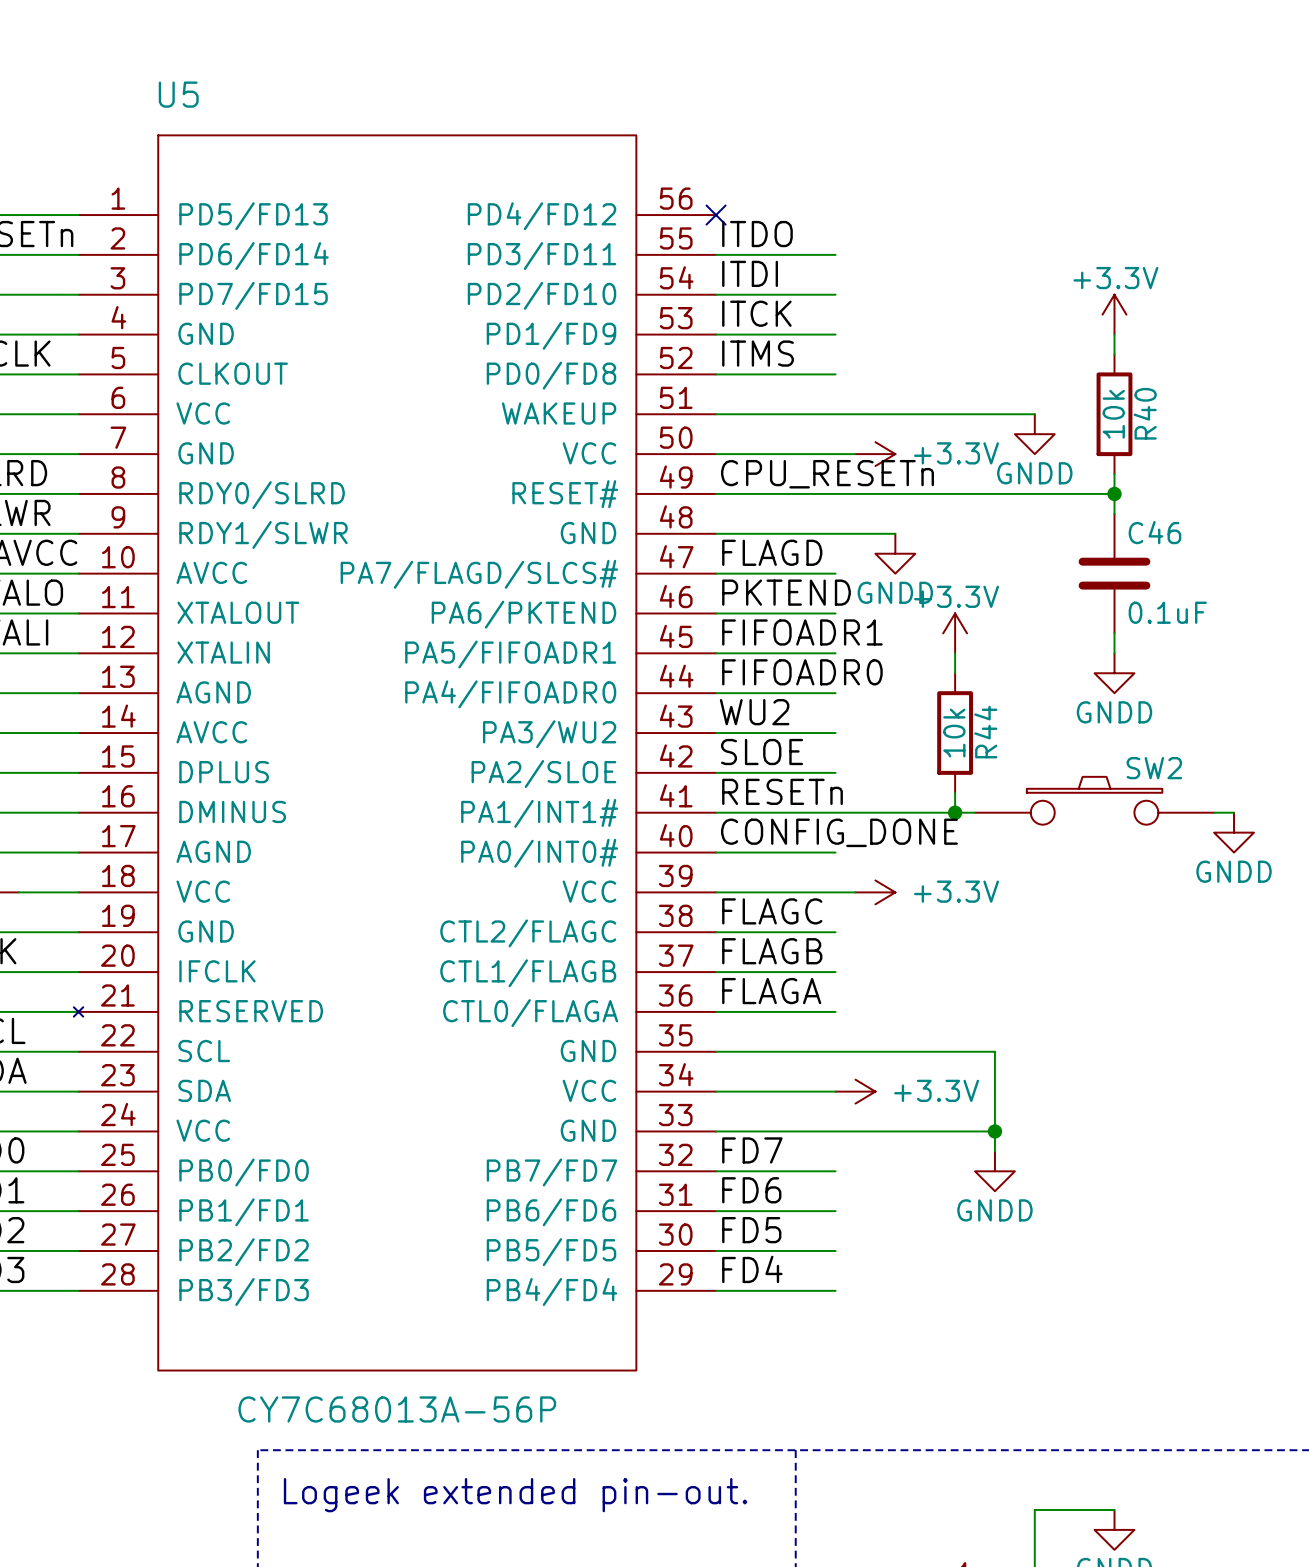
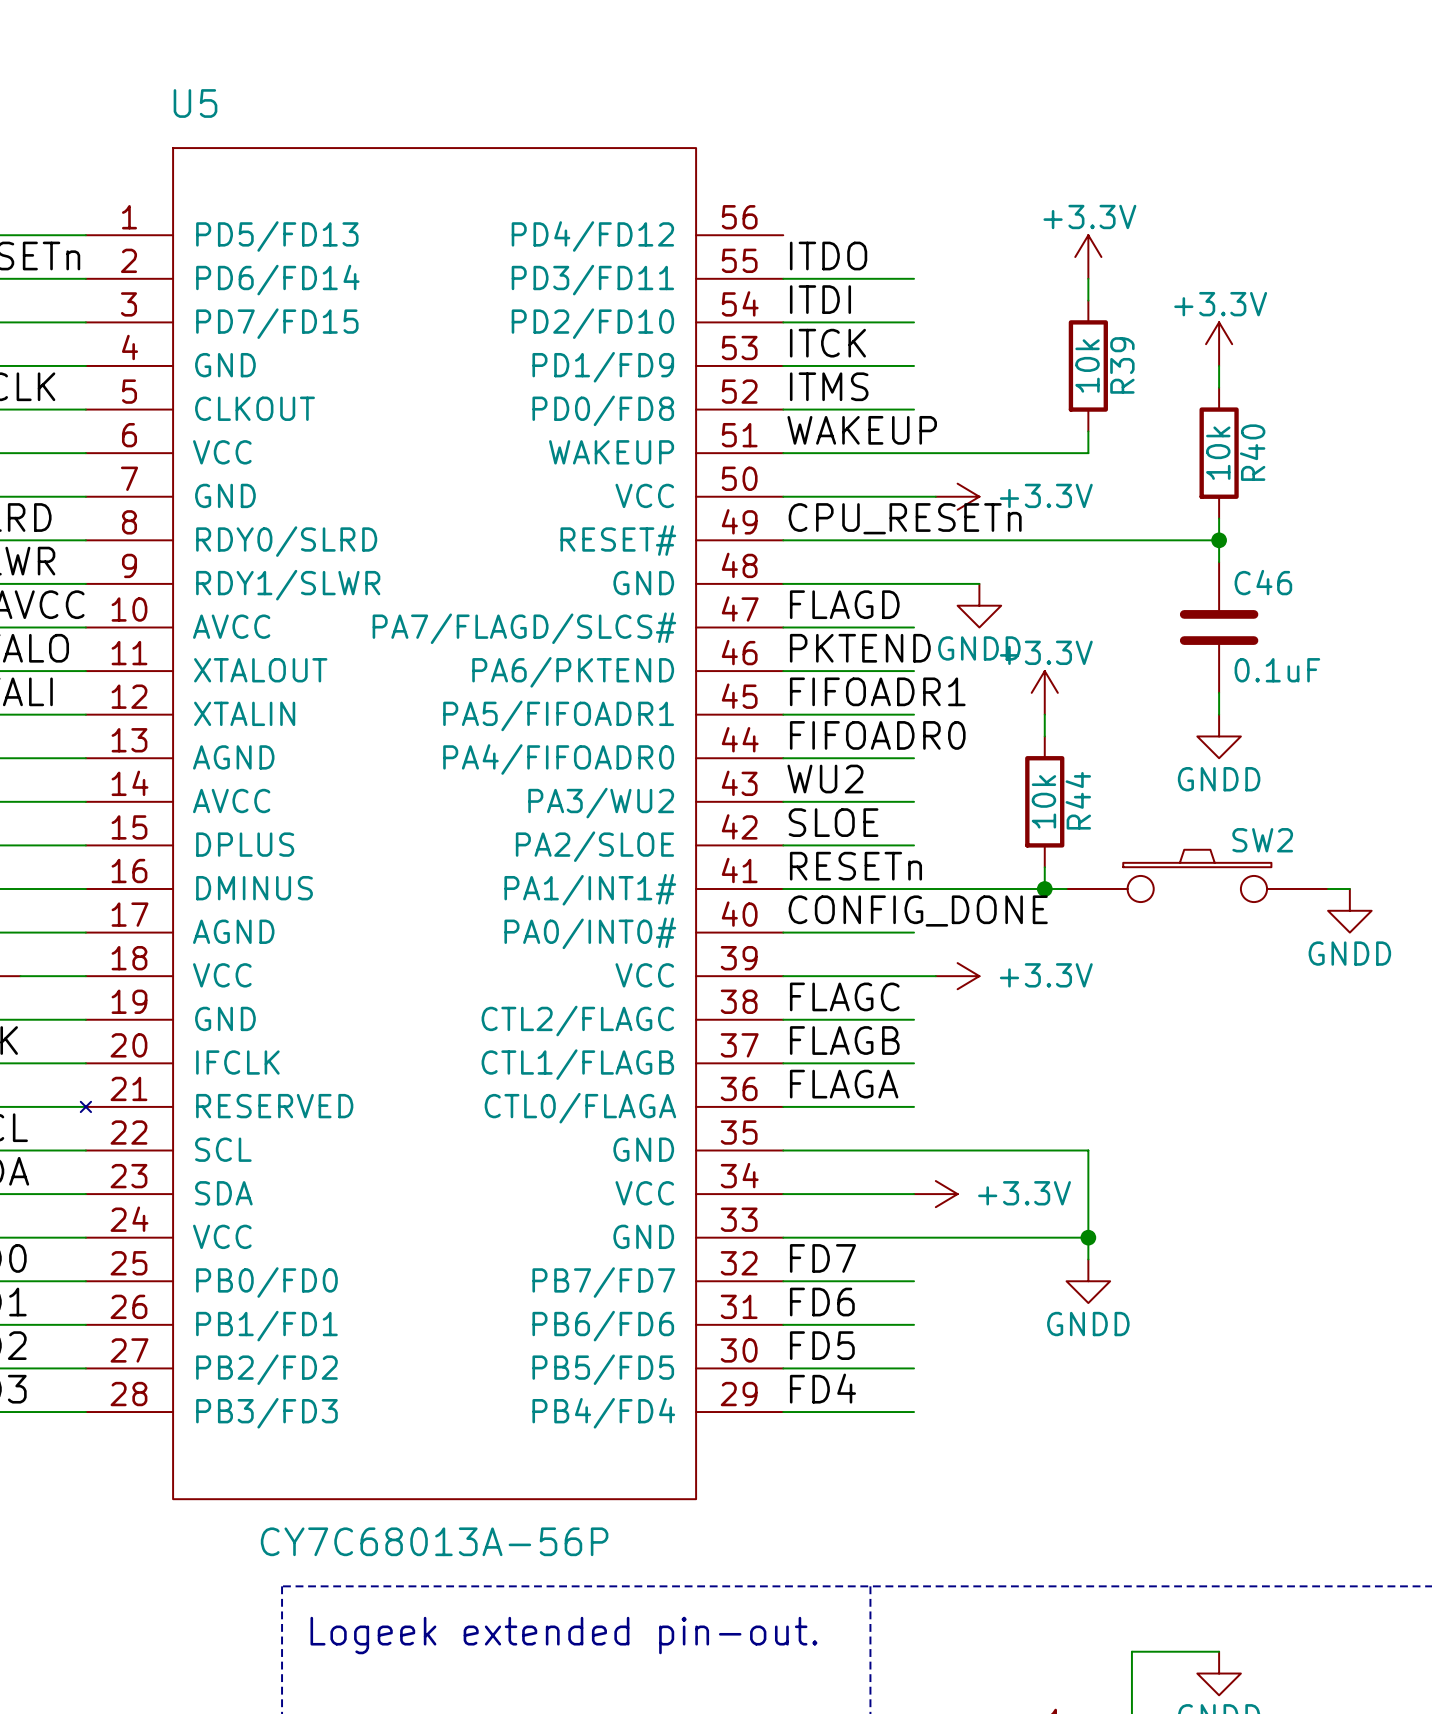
no-connect mark: (716, 215) -> none
power symbol: none -> +3.3V (1088, 257)
wire: none -> (1088, 278) (1088, 300)
R39: none -> 10k (1088, 365)
label: none -> WAKEUP (862, 430)
wire: (994, 414) (1034, 414) -> (1088, 453) (1088, 431)
power symbol: GNDD (1034, 434) -> none

